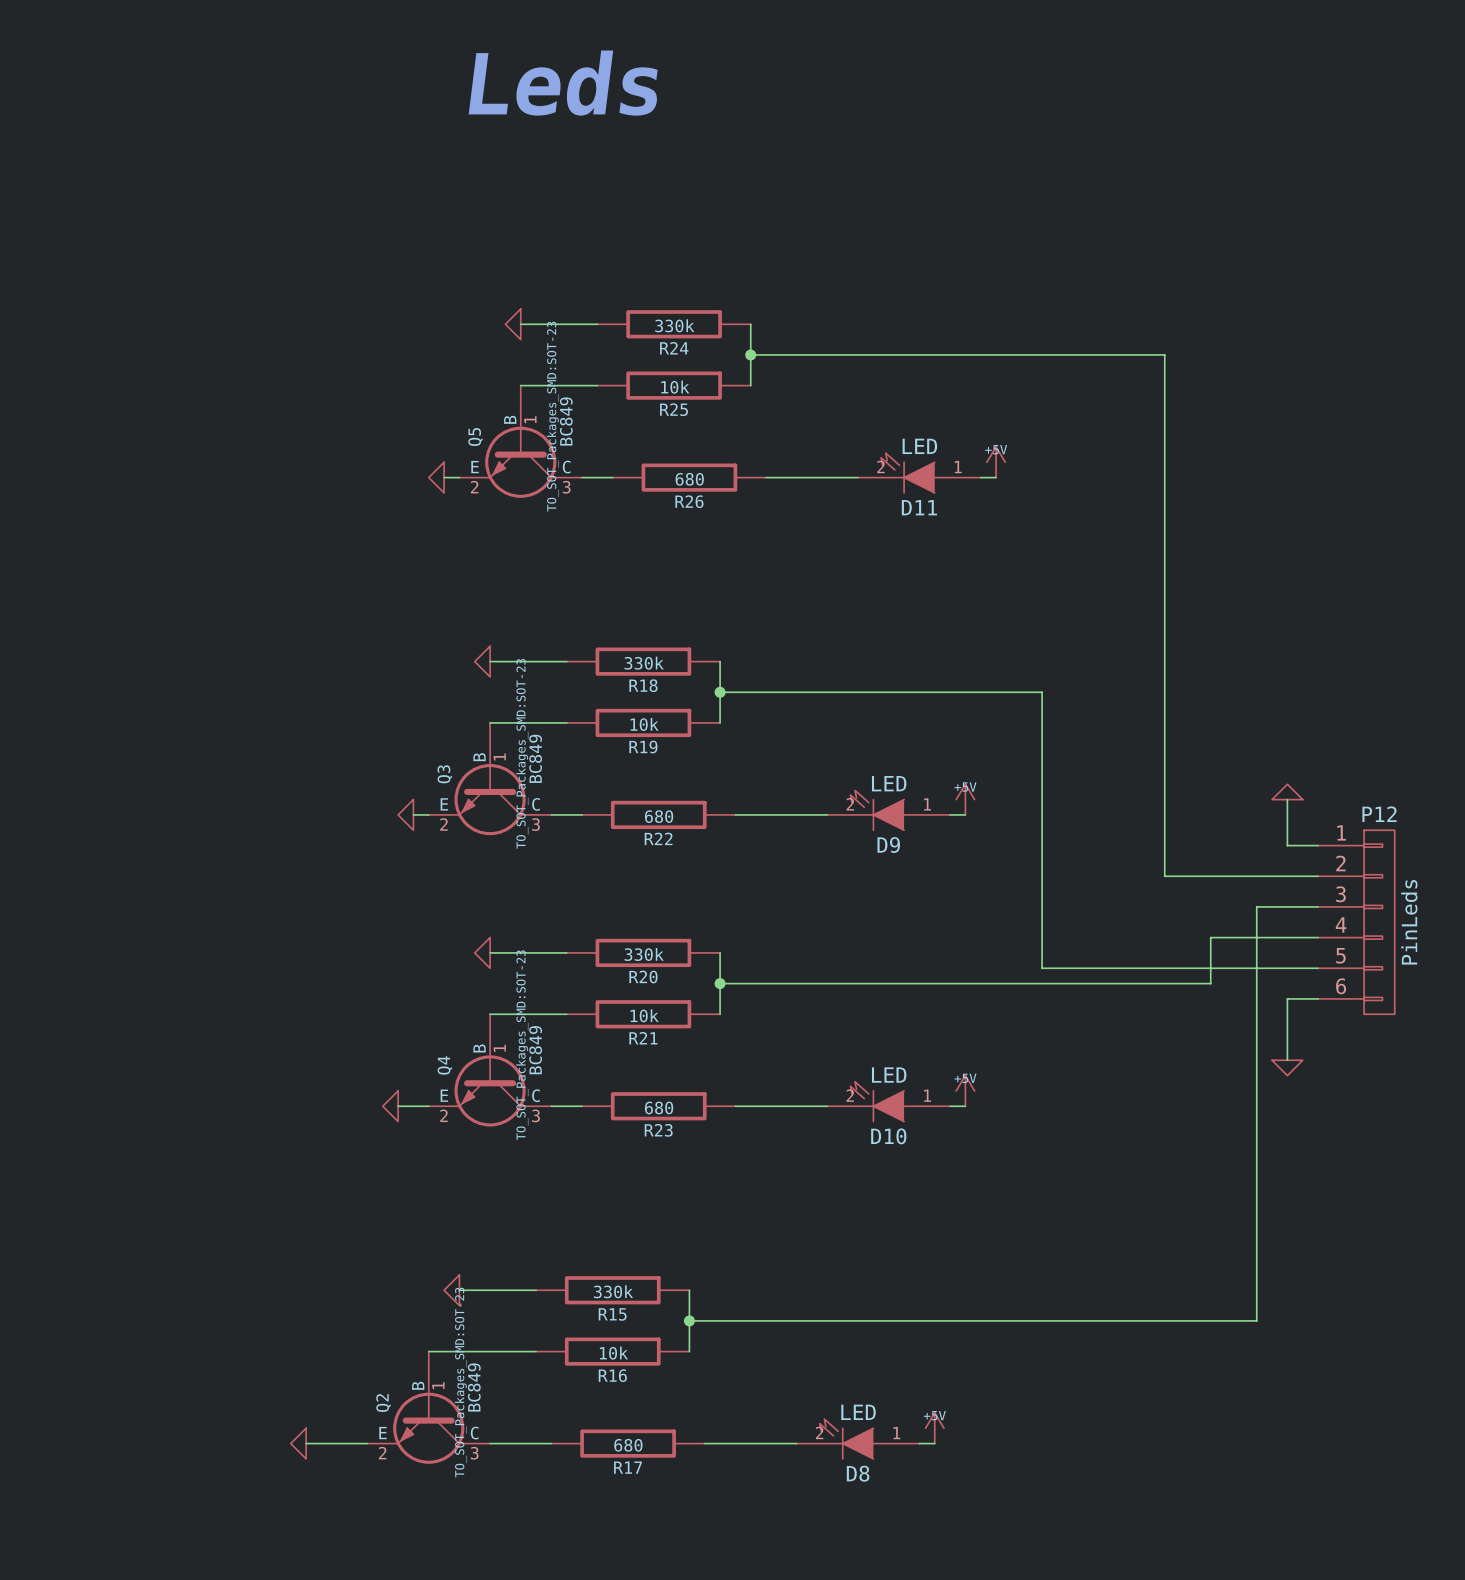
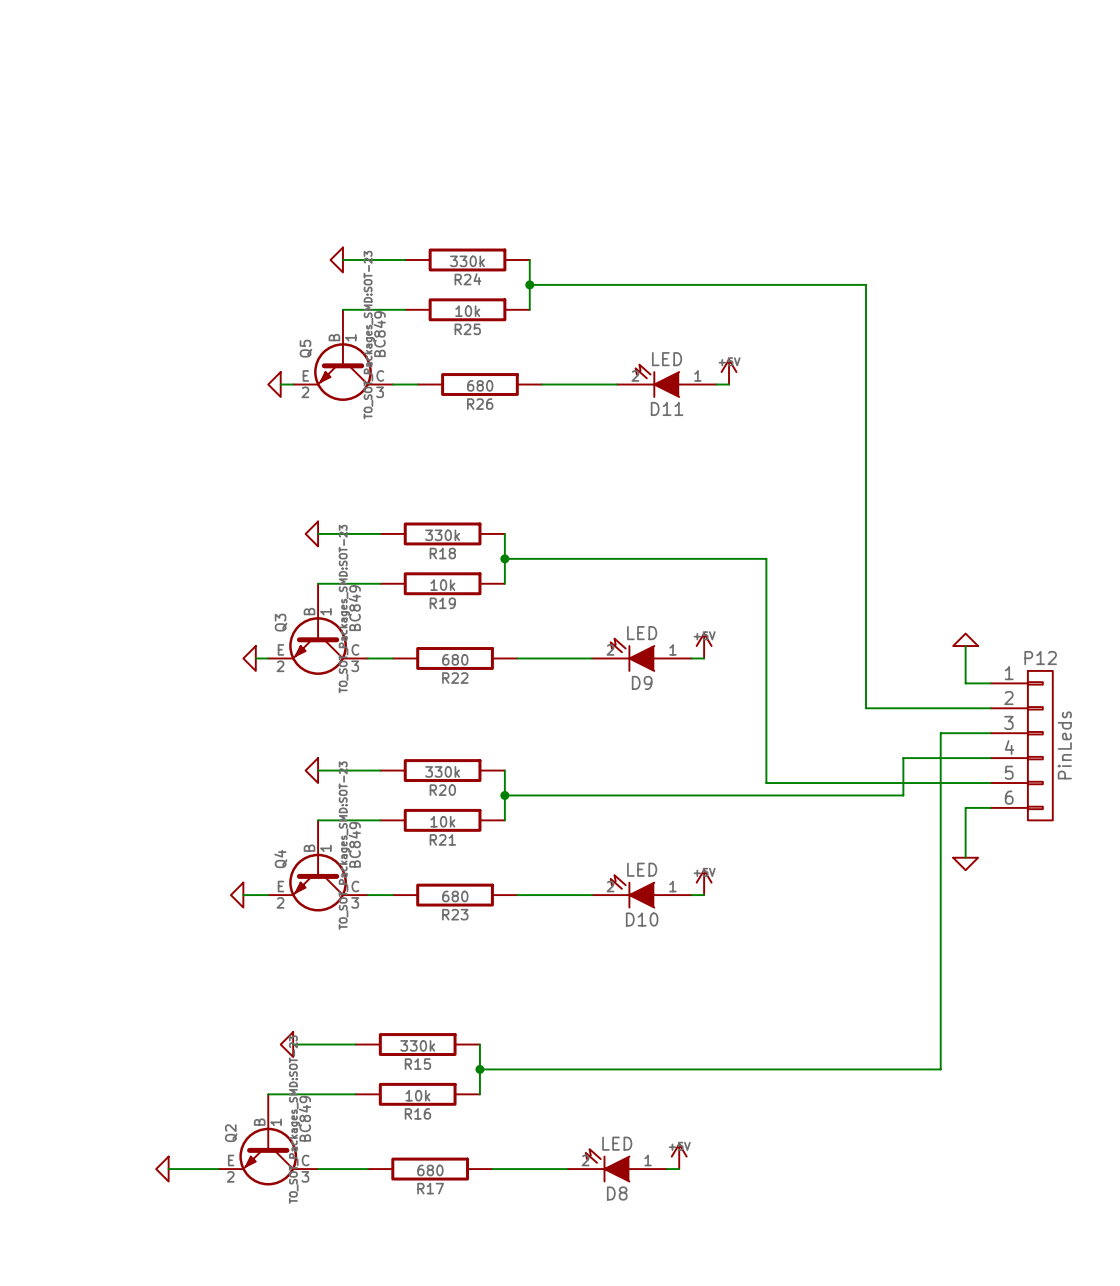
text: Leds (563, 83) -> none

